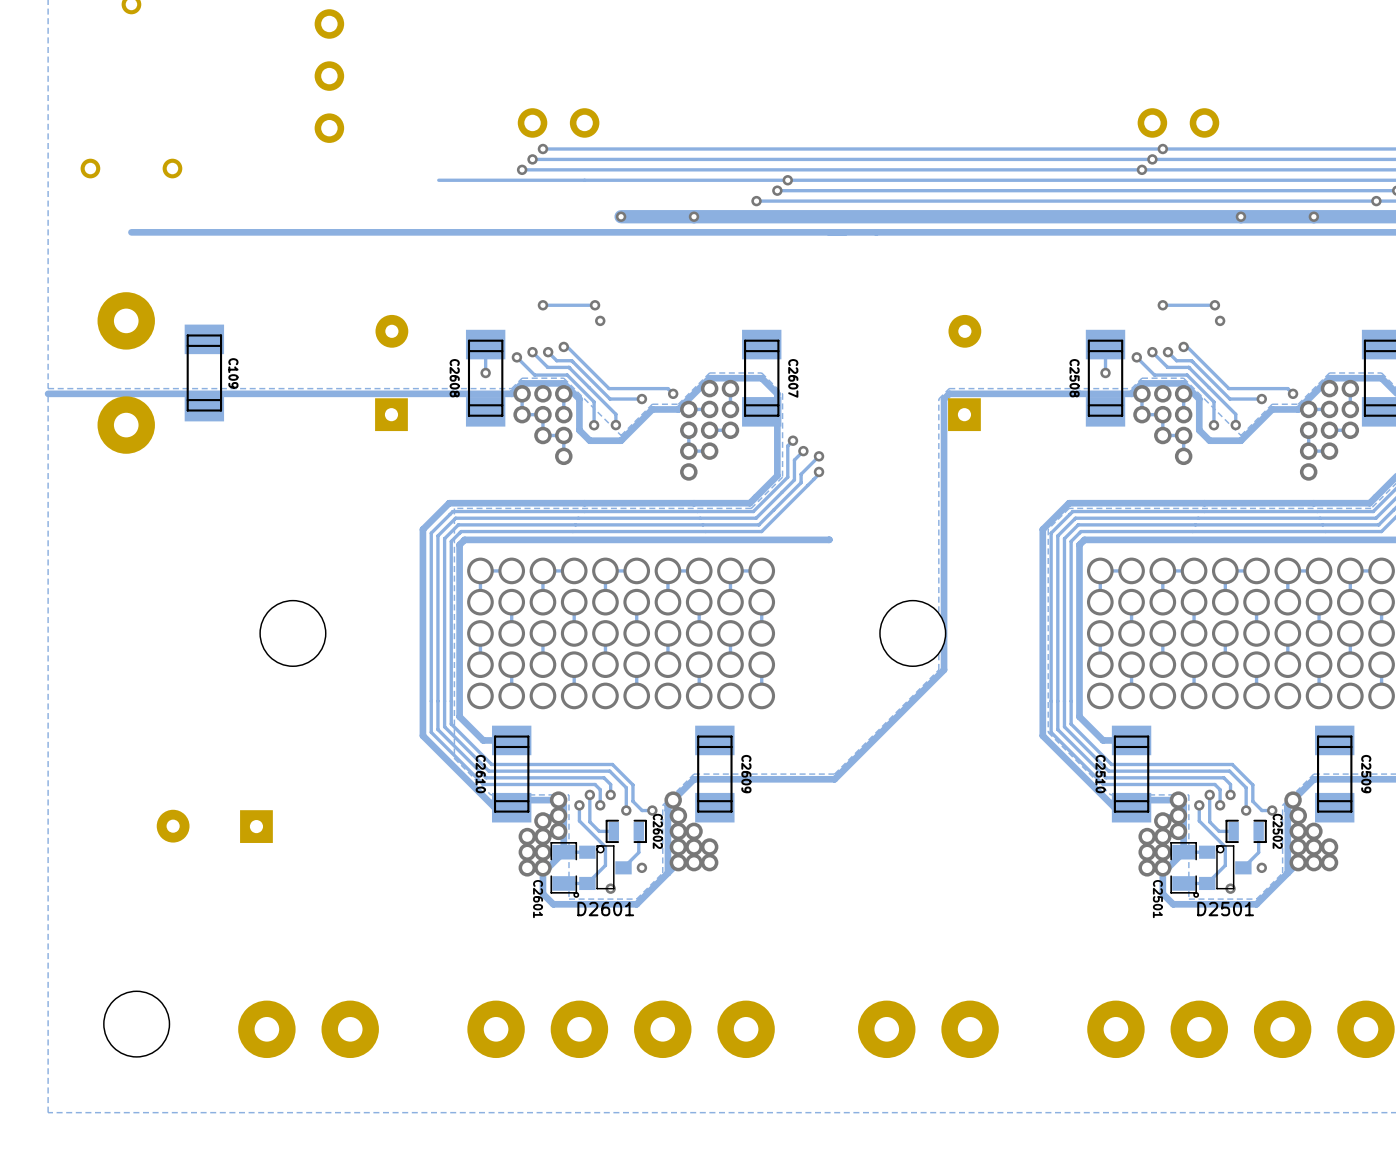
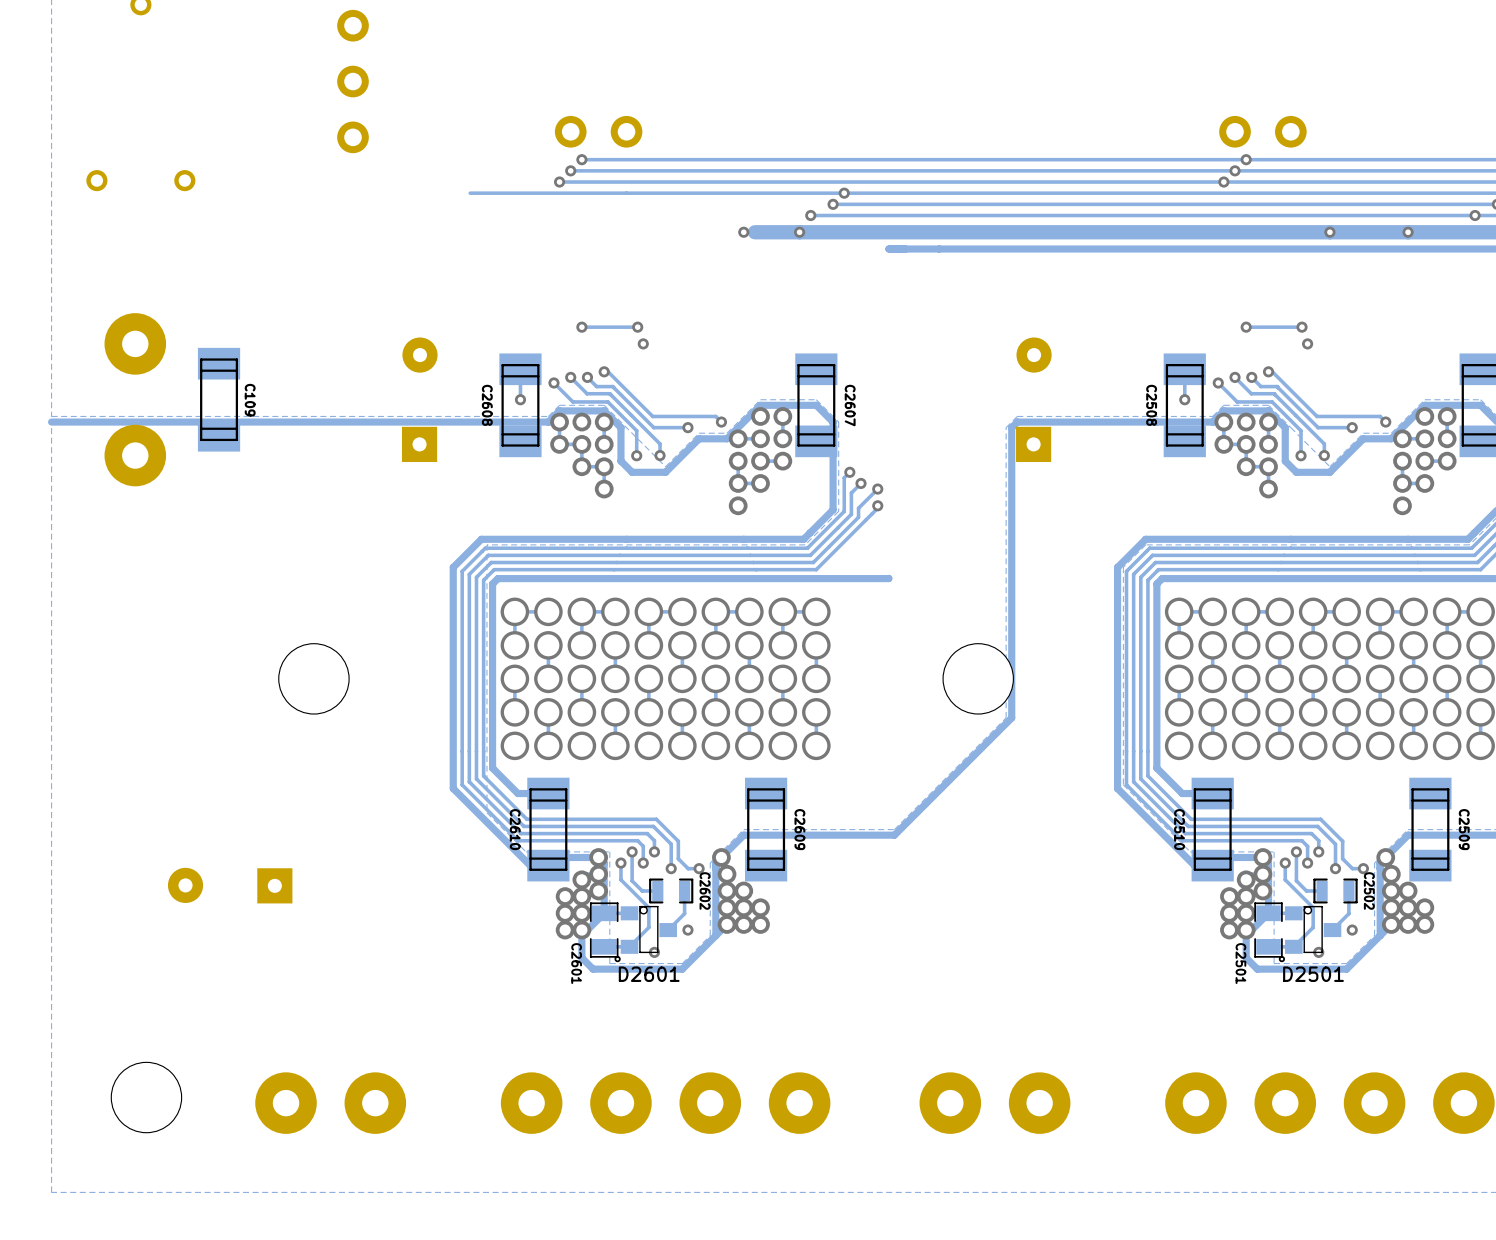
via: (621, 216) -> none
track: (704, 216) (621, 216) -> none
via: none -> (799, 232)
track: (829, 232) (131, 232) -> none

